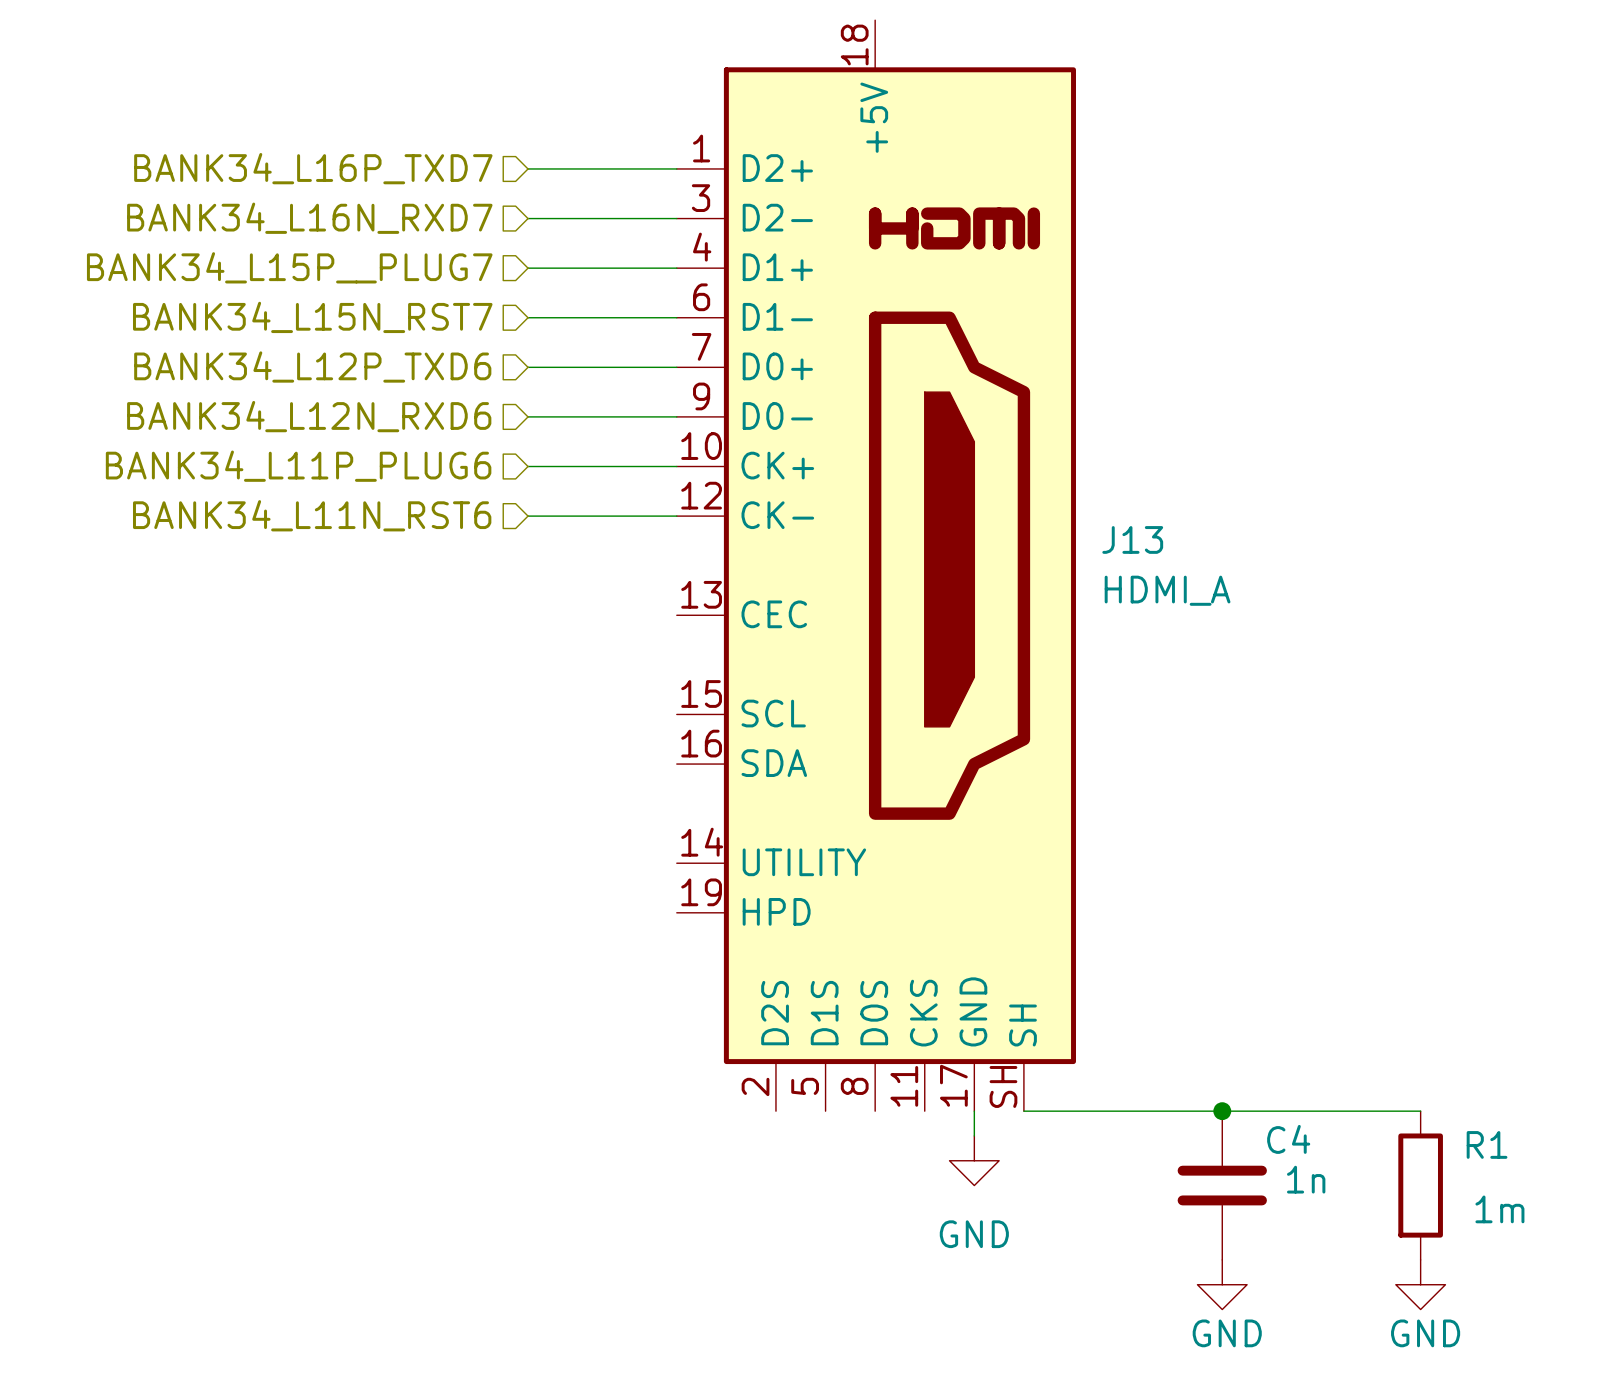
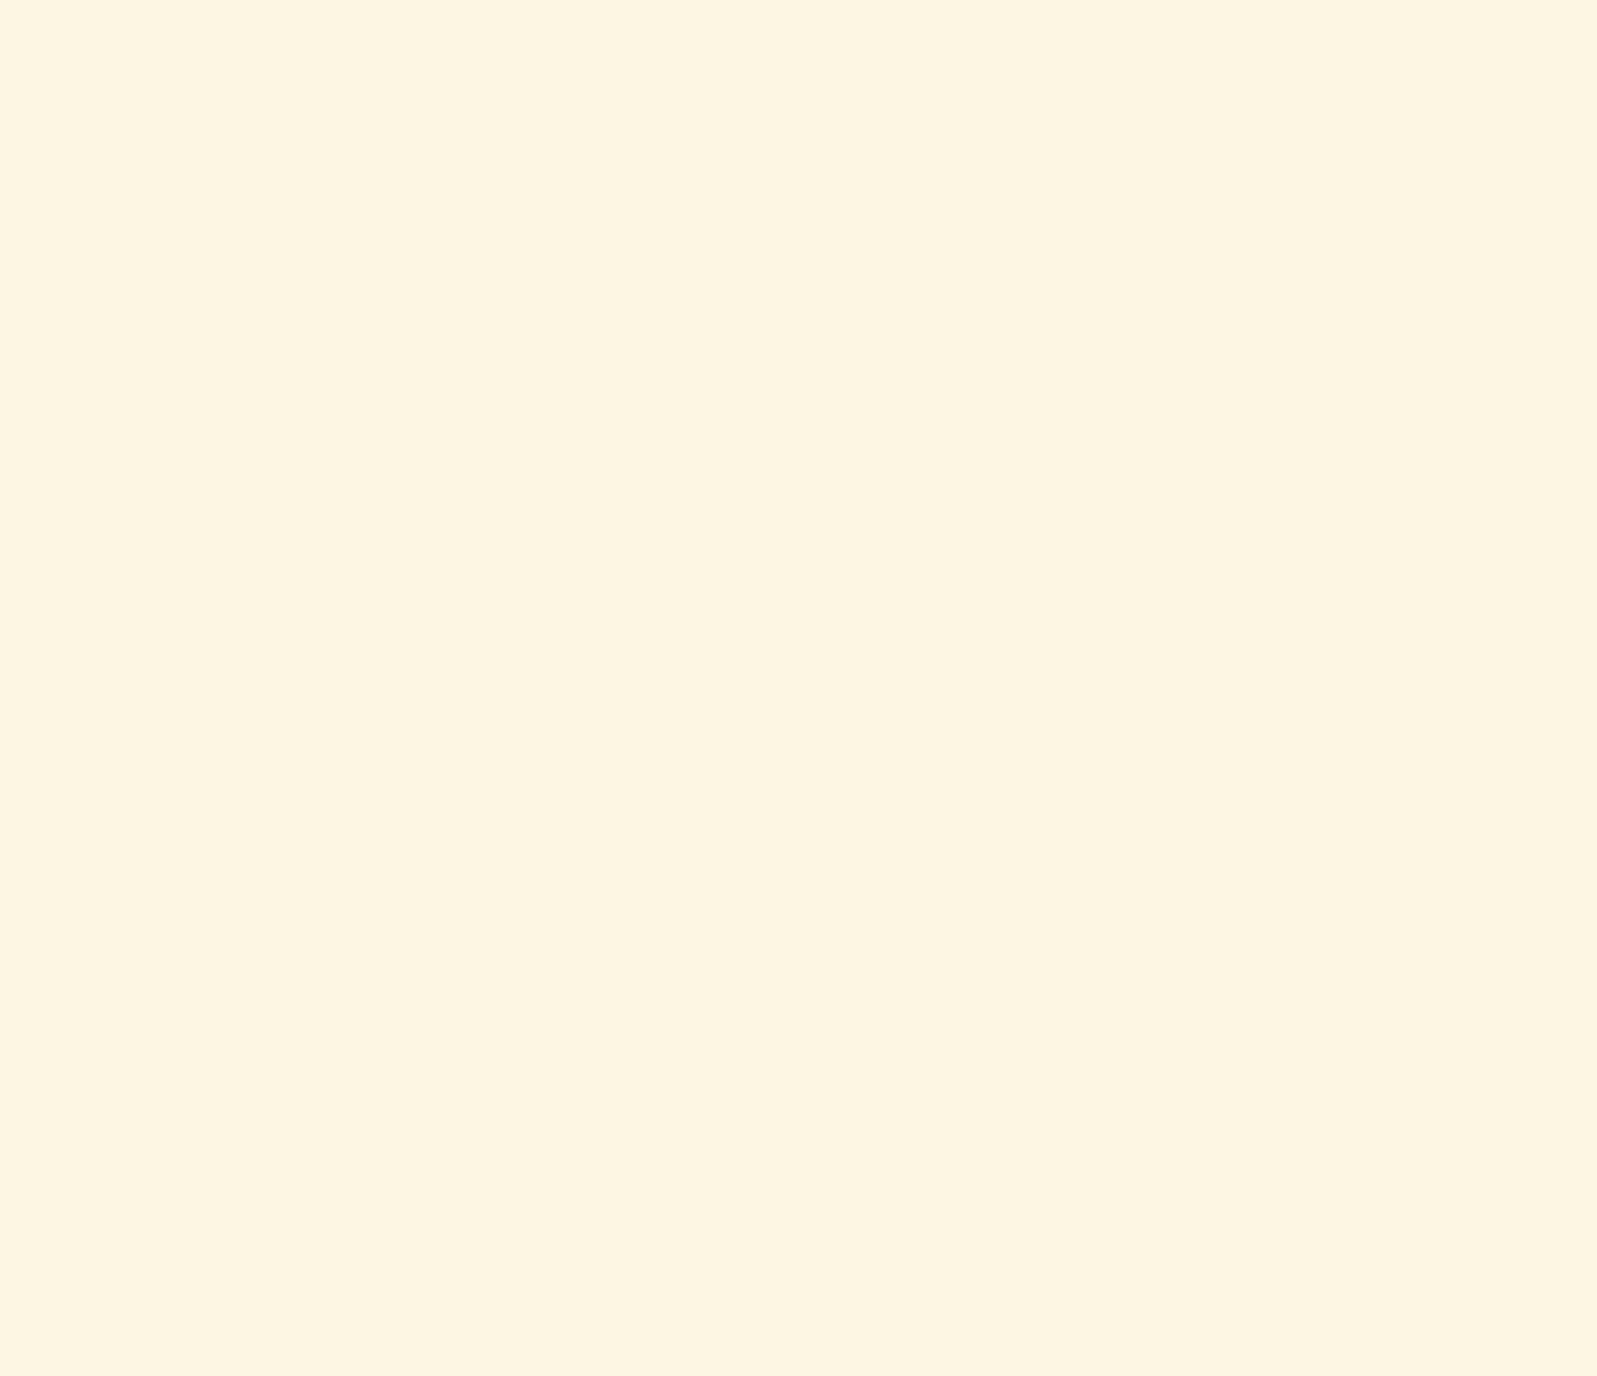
hierarchical label: BANK34_L16P_TXD7 (313, 168) -> none
wire: (528, 168) (676, 168) -> none
hierarchical label: BANK34_L16N_RXD7 (309, 218) -> none
wire: (528, 218) (676, 218) -> none
hierarchical label: BANK34_L15P__PLUG7 (289, 267) -> none
wire: (528, 268) (676, 268) -> none
hierarchical label: BANK34_L15N_RST7 (312, 317) -> none
wire: (528, 317) (676, 317) -> none
hierarchical label: BANK34_L12P_TXD6 (312, 366) -> none
wire: (528, 367) (676, 367) -> none
hierarchical label: BANK34_L12N_RXD6 (309, 416) -> none
wire: (528, 416) (676, 416) -> none
hierarchical label: BANK34_L11P_PLUG6 (298, 466) -> none
wire: (528, 466) (676, 466) -> none
hierarchical label: BANK34_L11N_RST6 (312, 515) -> none
wire: (528, 516) (676, 516) -> none
J13: HDMI_A (876, 565) -> none
wire: (974, 1111) (974, 1135) -> none
wire: (1023, 1111) (1420, 1111) -> none
junction: (1222, 1111) -> none
power symbol: GND (974, 1160) -> none
C4: 1n (1222, 1185) -> none
R1: 1m (1420, 1185) -> none
power symbol: GND (1222, 1284) -> none
power symbol: GND (1420, 1284) -> none

